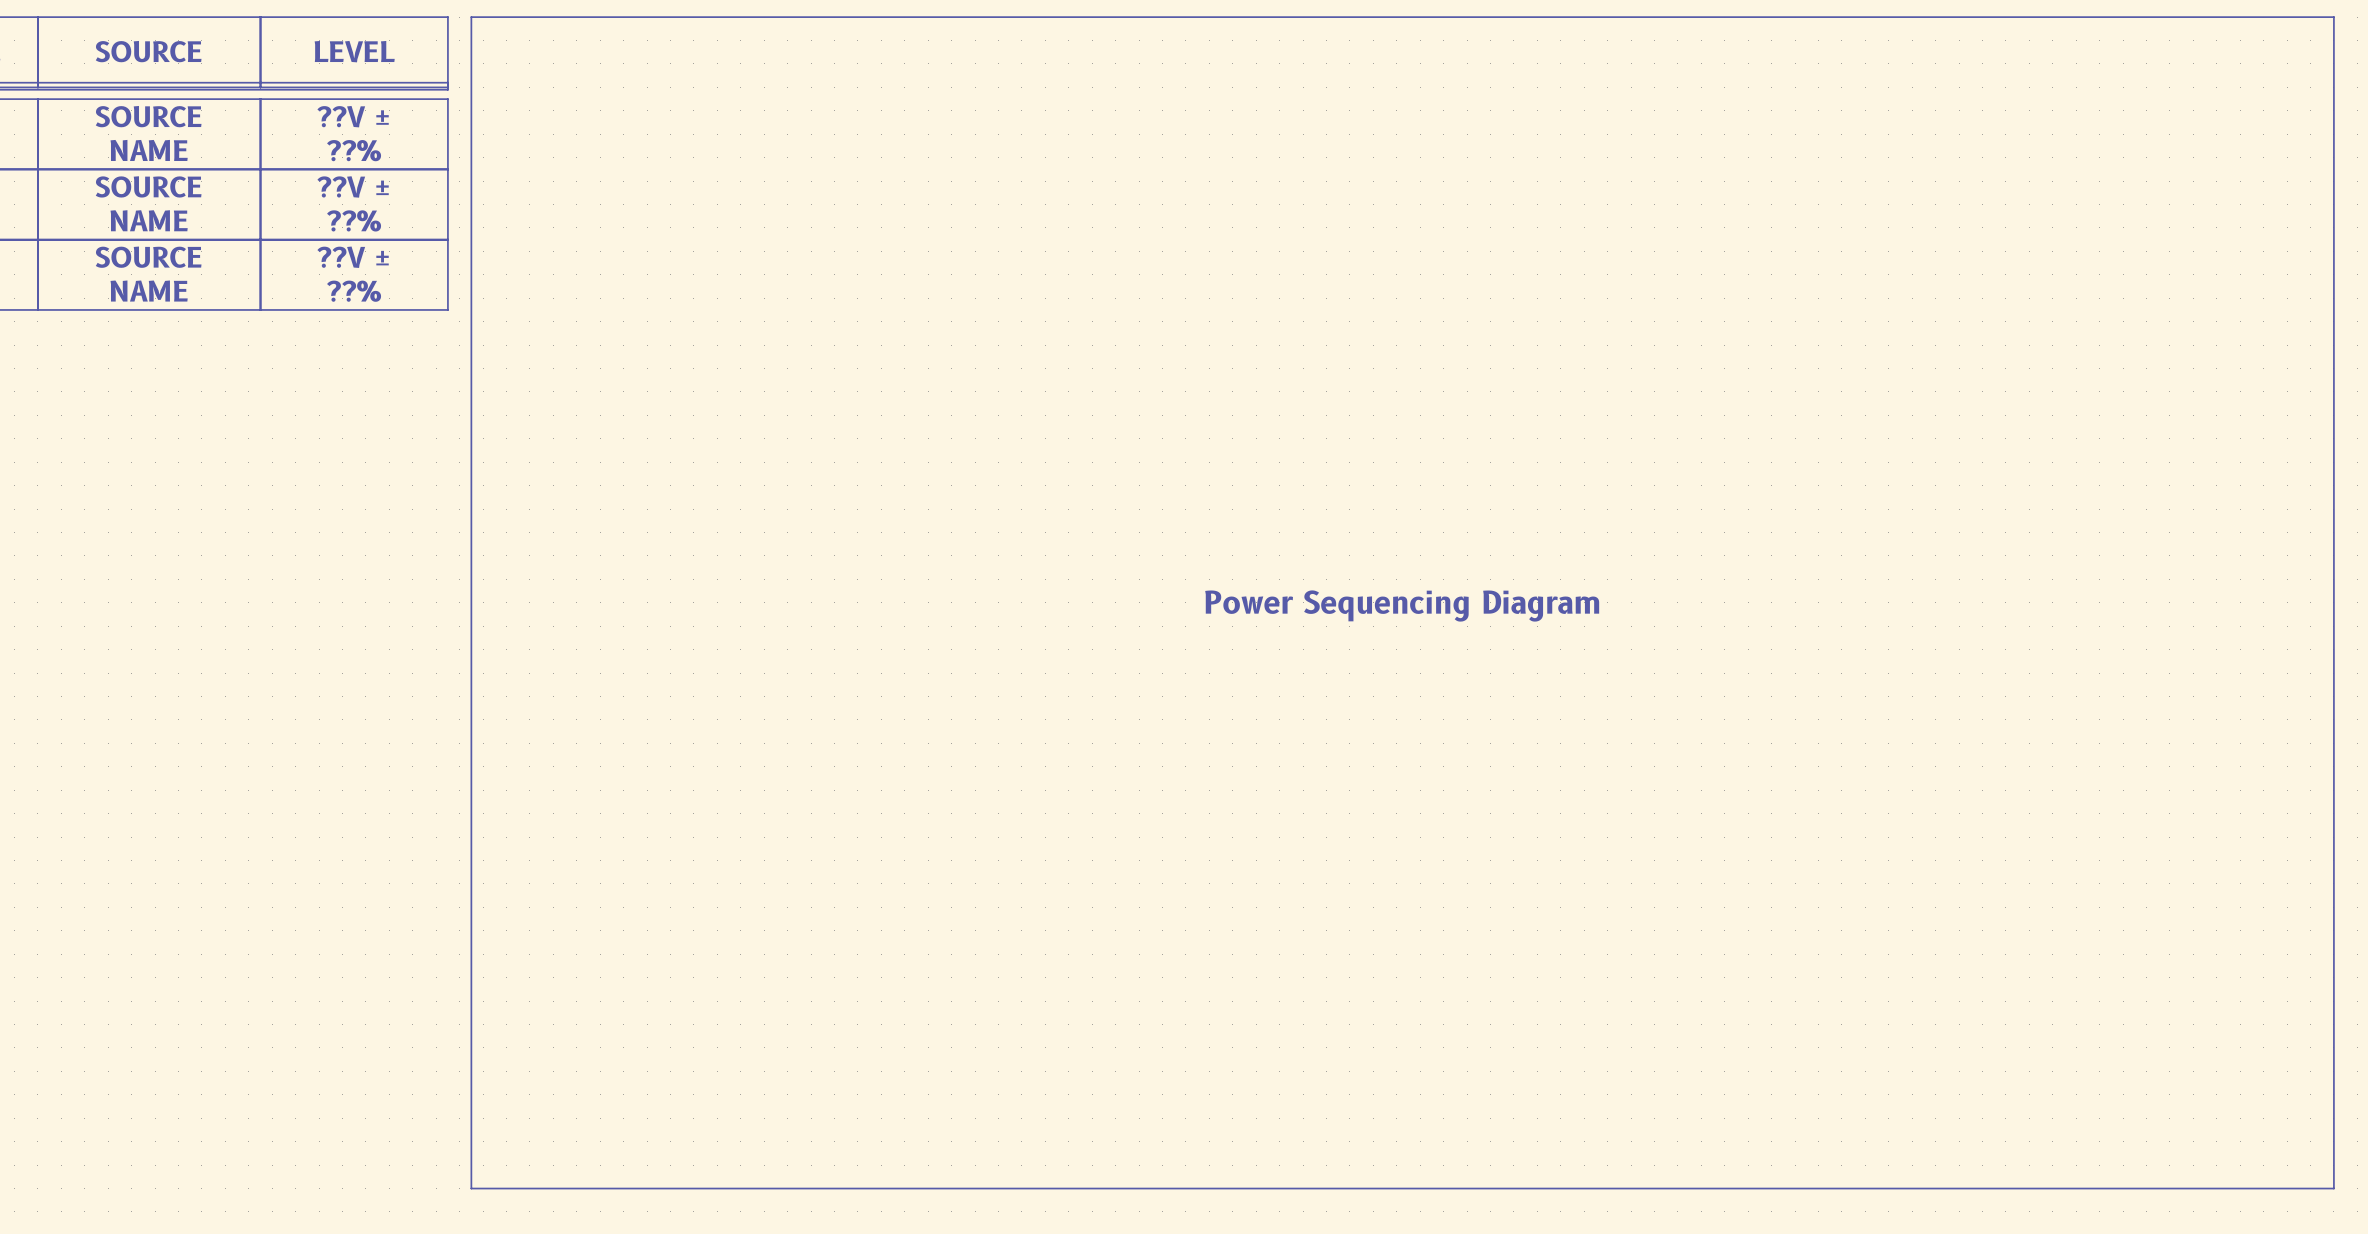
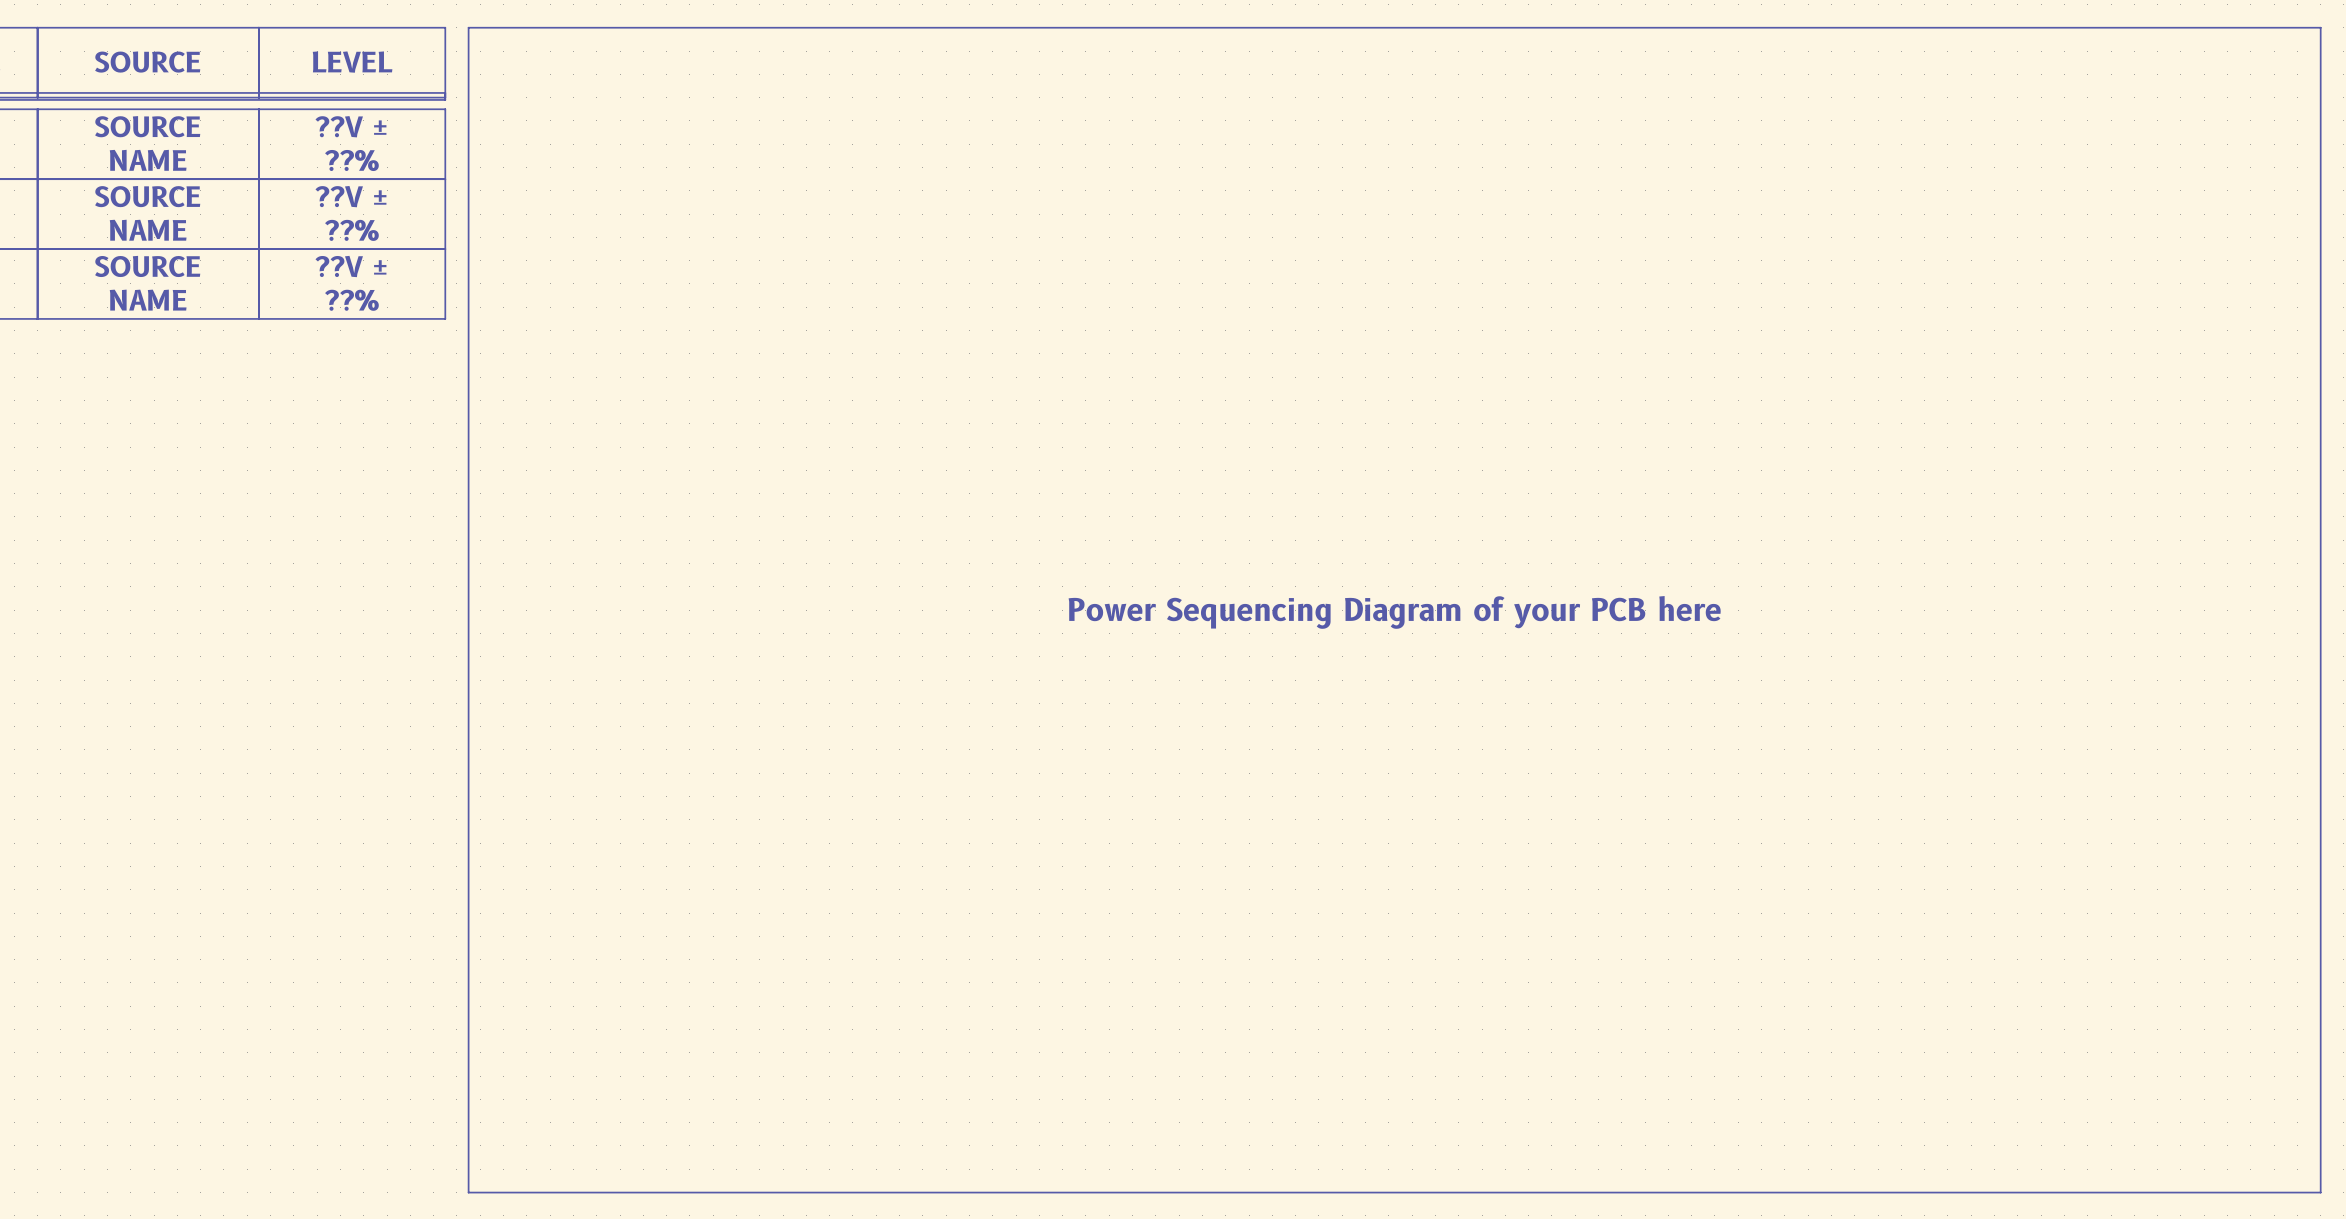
text: Power Sequencing Diagram (1402, 605) -> Power Sequencing Diagram of your PCB here (1394, 612)

